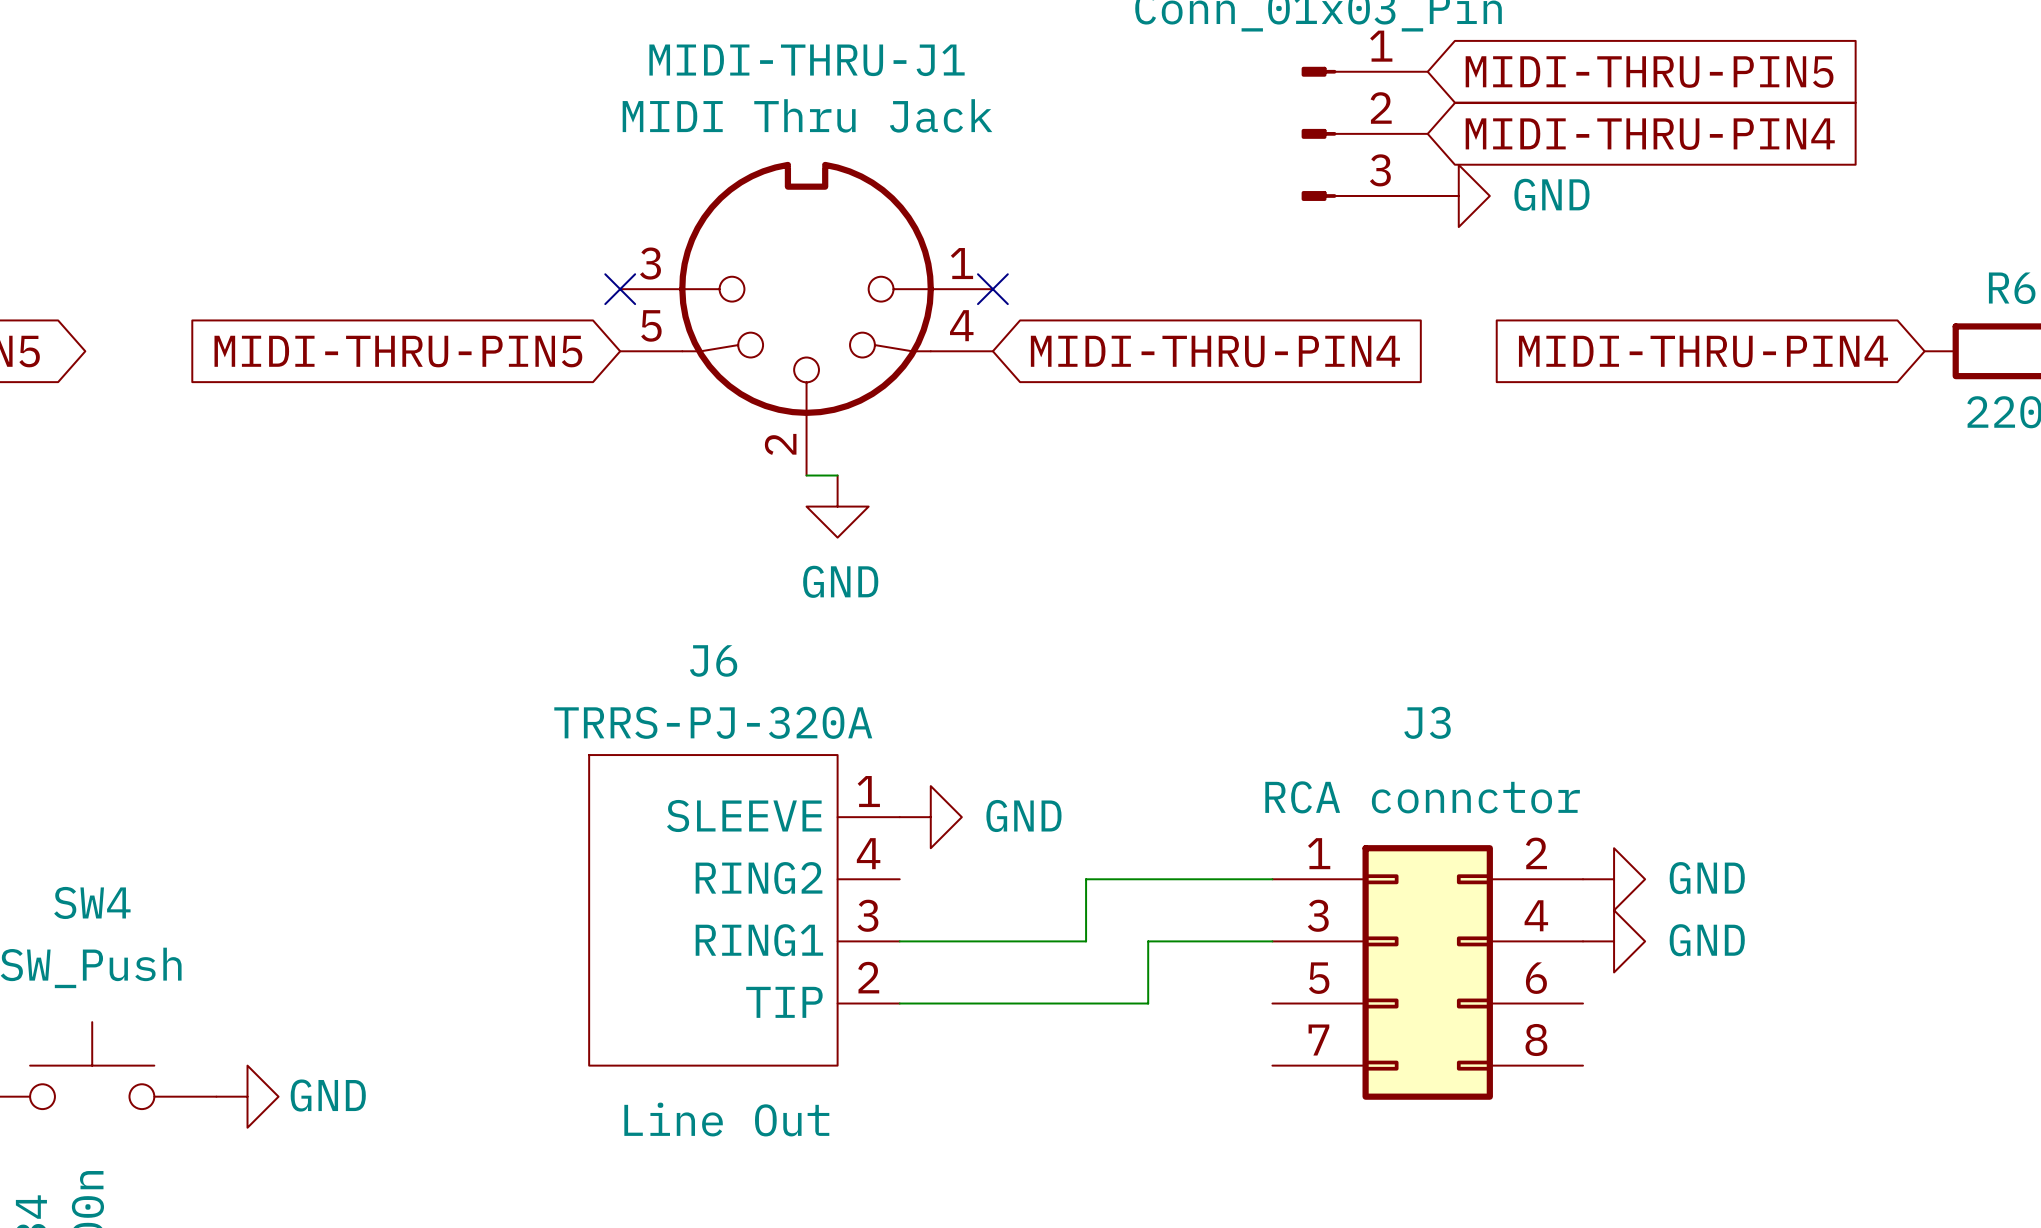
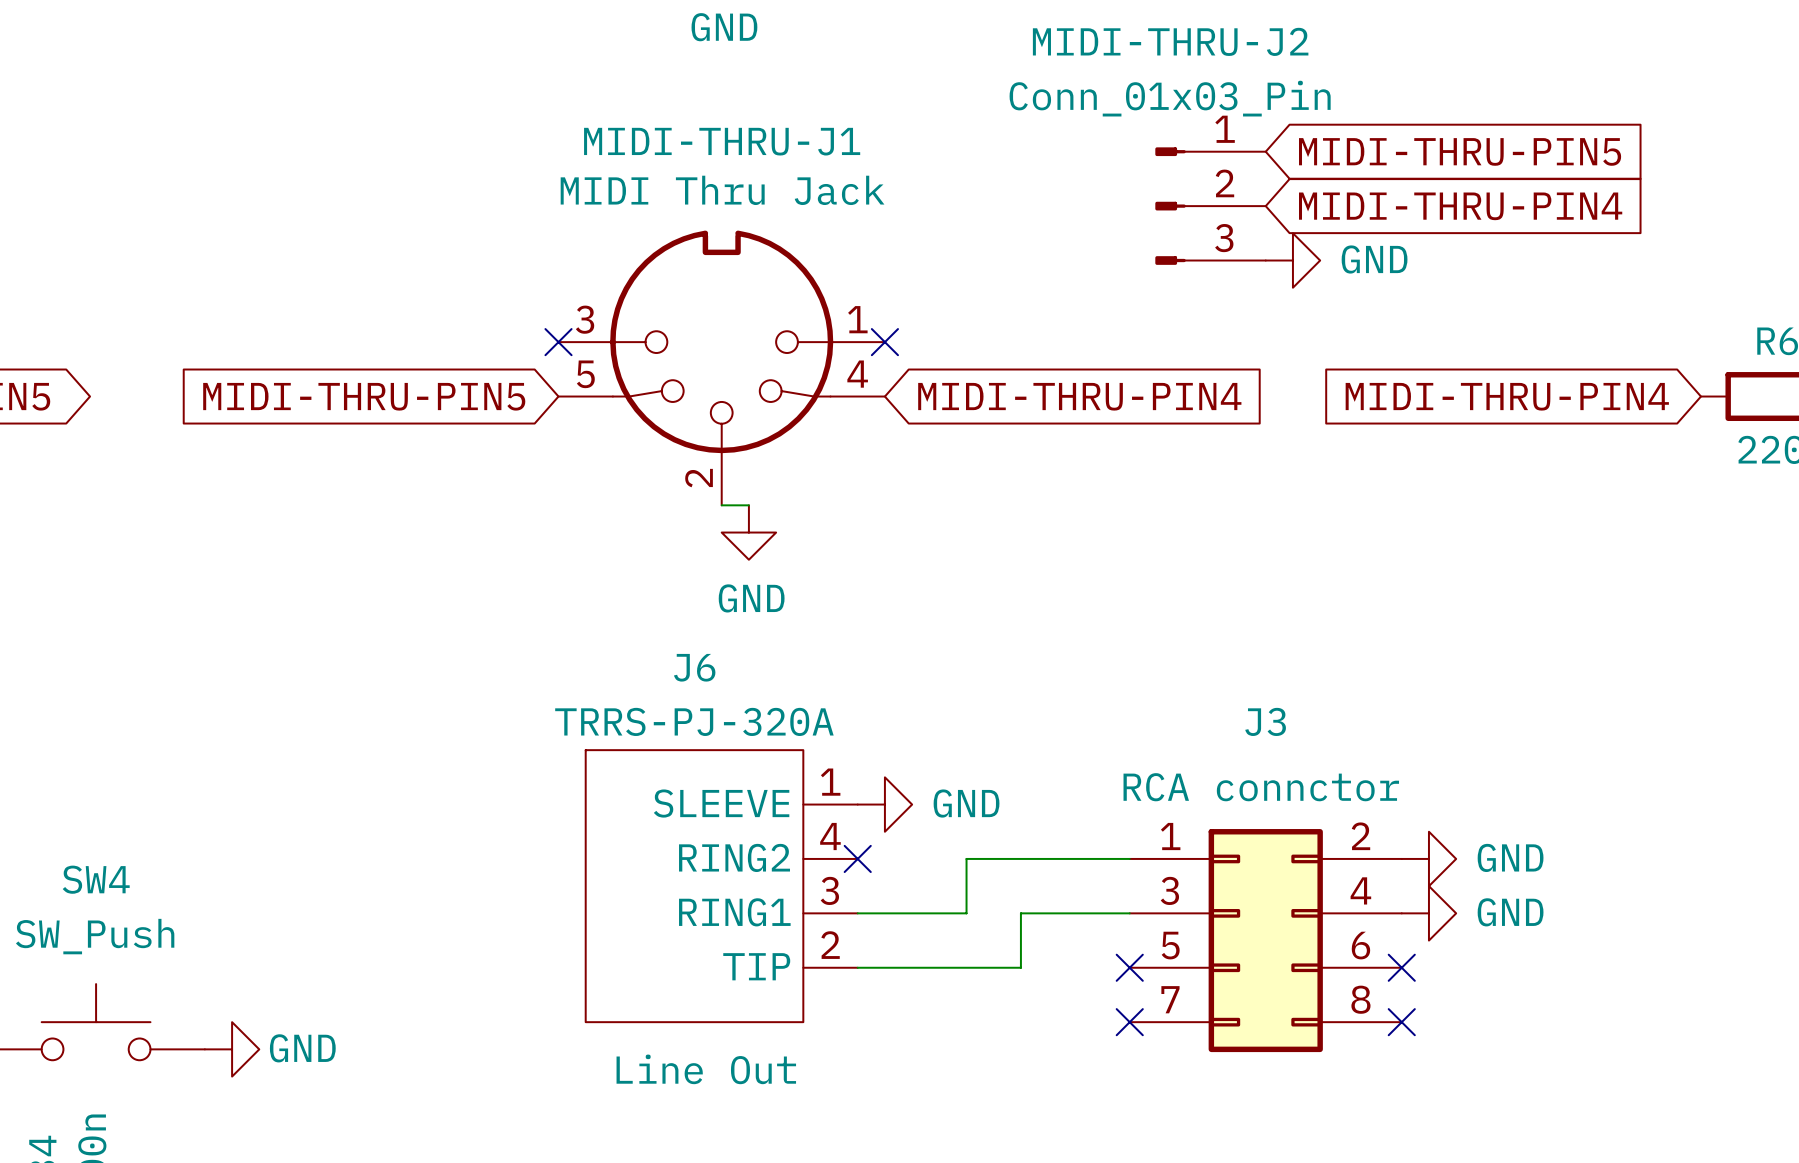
power symbol position: GND (930, 817) -> GND (884, 804)
no-connect mark: none -> (857, 858)
J6 position: (744, 910) -> (721, 886)
no-connect mark: none -> (1129, 967)
no-connect mark: none -> (1401, 967)
no-connect mark: none -> (1129, 1022)
no-connect mark: none -> (1401, 1022)

